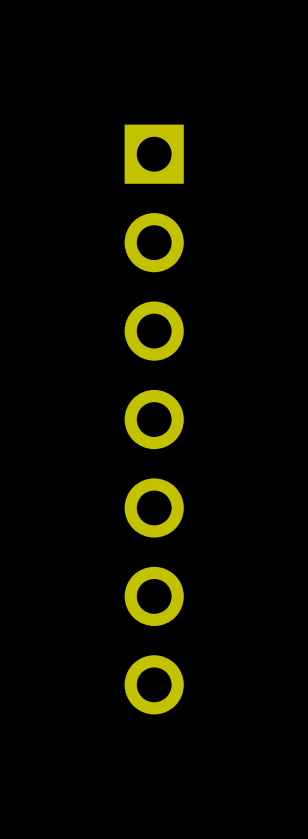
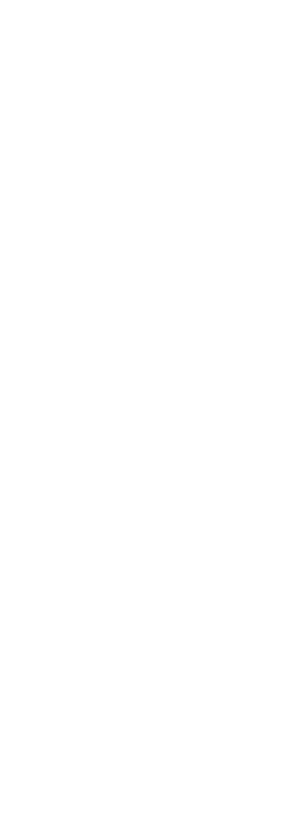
part: (154, 419) -> none

